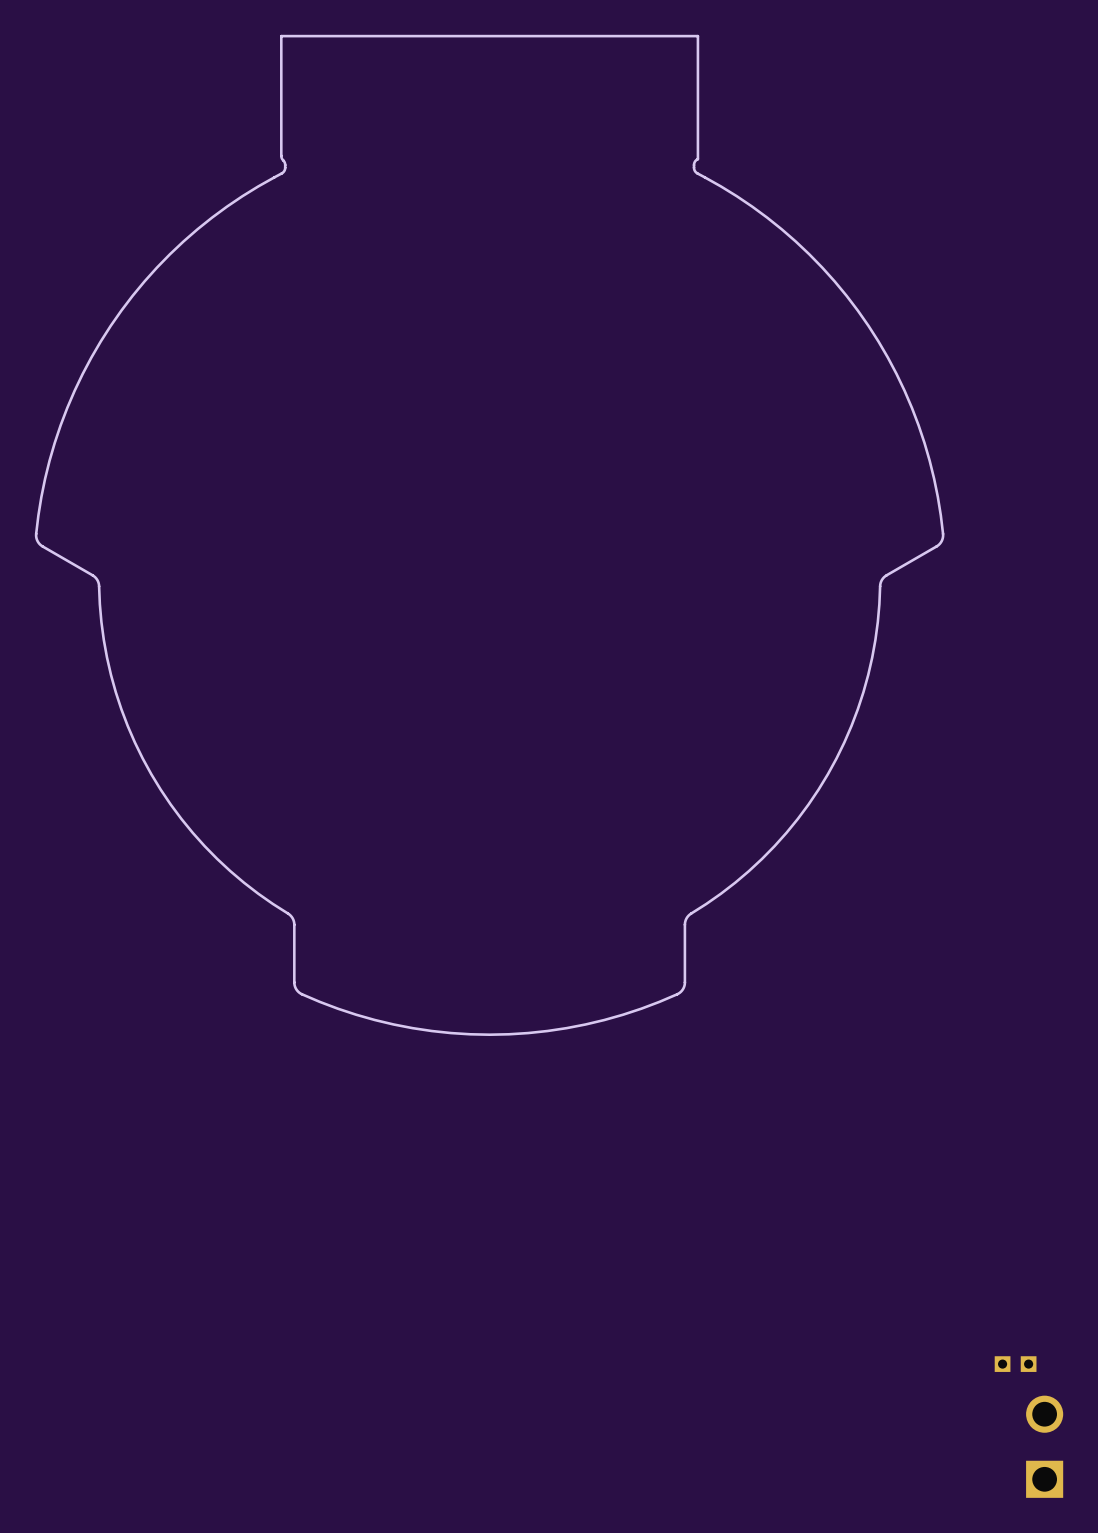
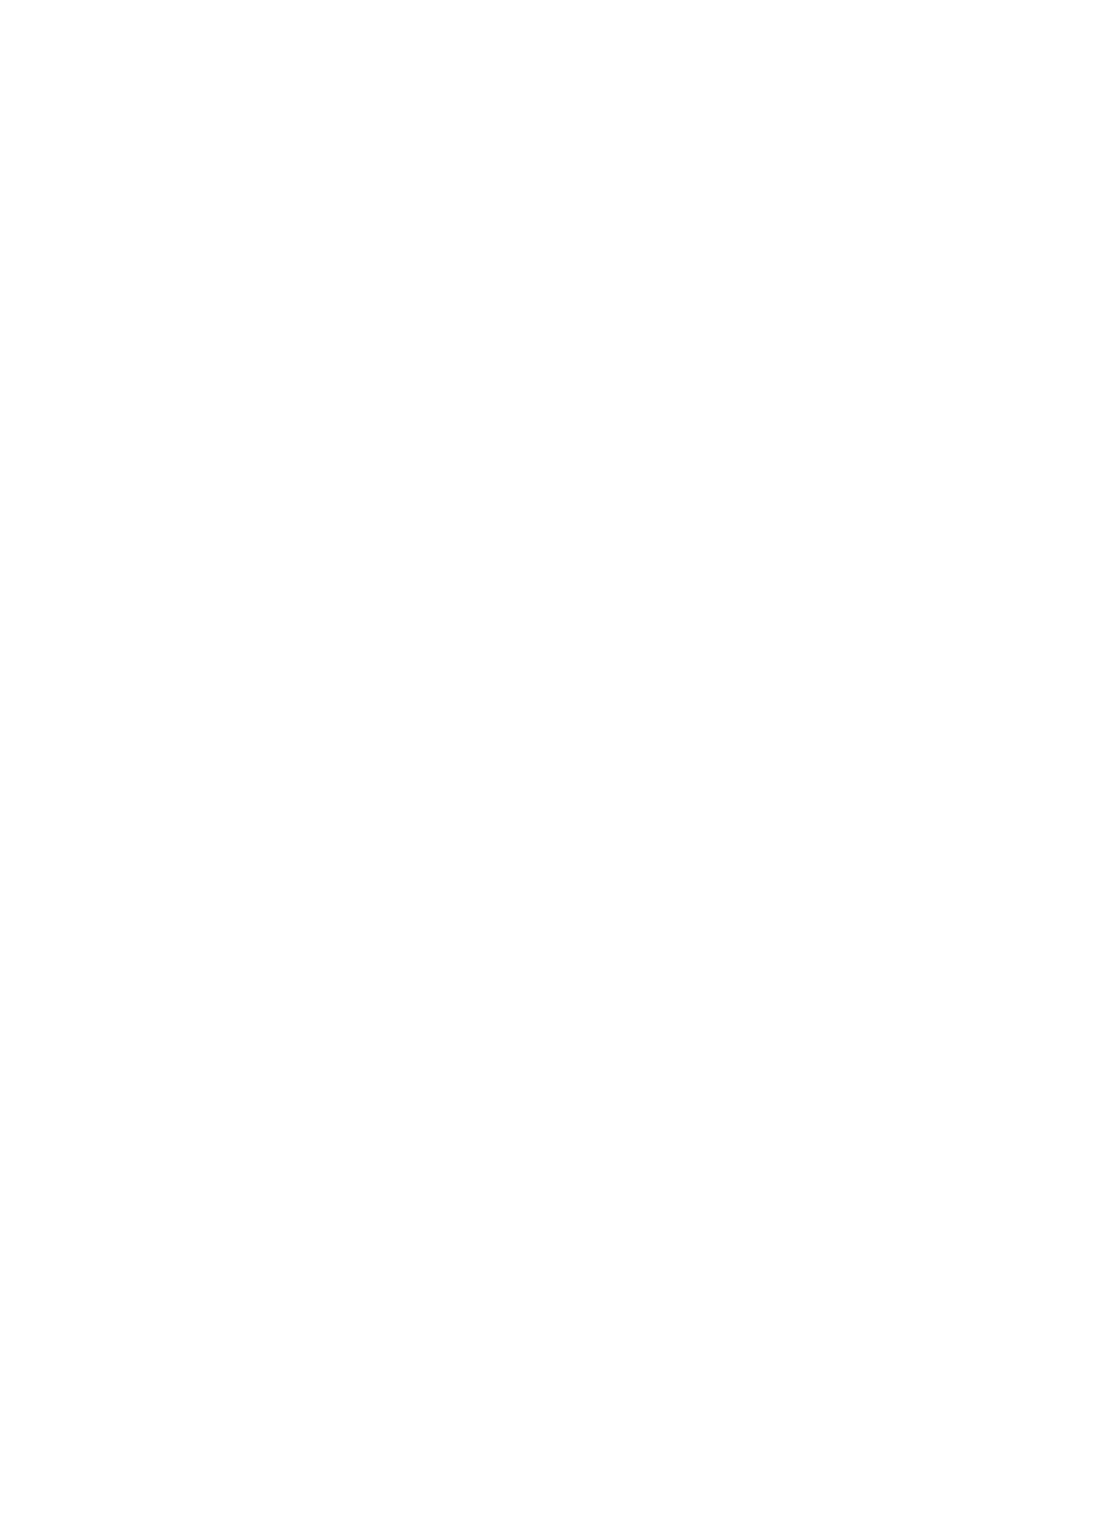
board edge: (697, 36) (697, 159) (694, 162) (694, 170) (752, 206) (795, 241) (834, 281) (868, 325) (896, 374) (918, 425) (934, 478) (940, 515) (942, 539) (937, 545) (886, 575) (881, 579) (875, 639) (868, 674) (851, 726) (836, 758) (808, 804) (774, 846) (735, 882) (687, 916) (684, 924) (684, 983) (679, 992) (641, 1008) (604, 1020) (566, 1028) (508, 1034) (470, 1034) (412, 1028) (374, 1020) (319, 1001) (300, 993) (295, 986) (294, 924) (291, 916) (244, 882) (204, 846) (170, 804) (142, 758) (127, 726) (111, 674) (103, 639) (97, 579) (92, 575) (41, 545) (36, 539) (38, 515) (45, 478) (54, 442) (67, 407) (91, 357) (110, 325) (132, 295) (156, 267) (183, 241) (211, 217) (242, 196) (284, 171) (285, 163) (281, 155) (281, 36) (697, 36) -> none
part: (1028, 1427) -> none

